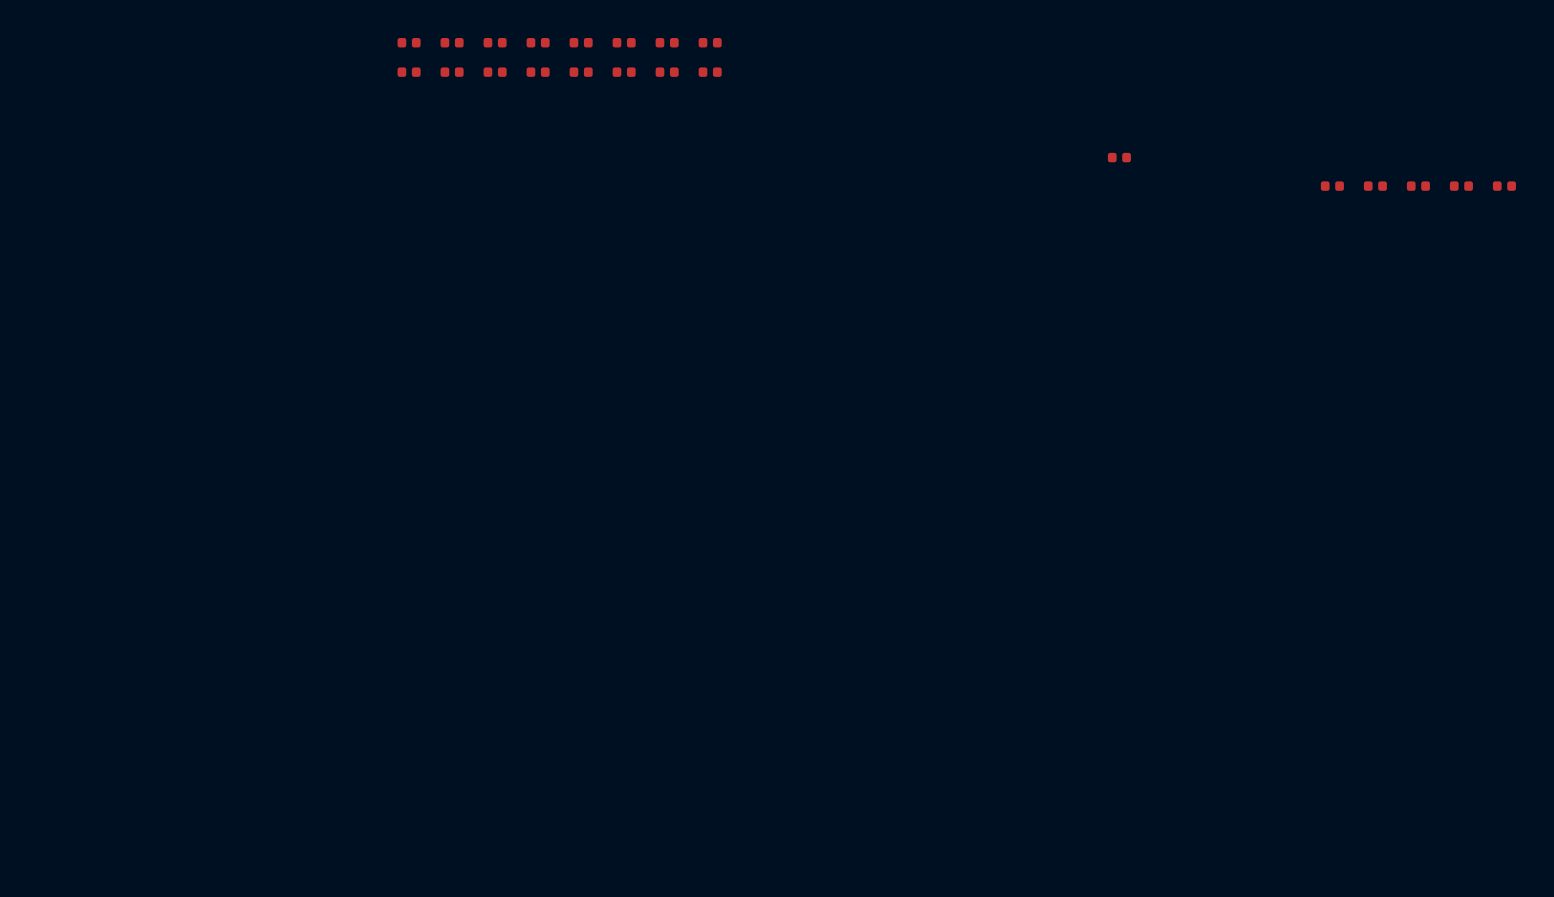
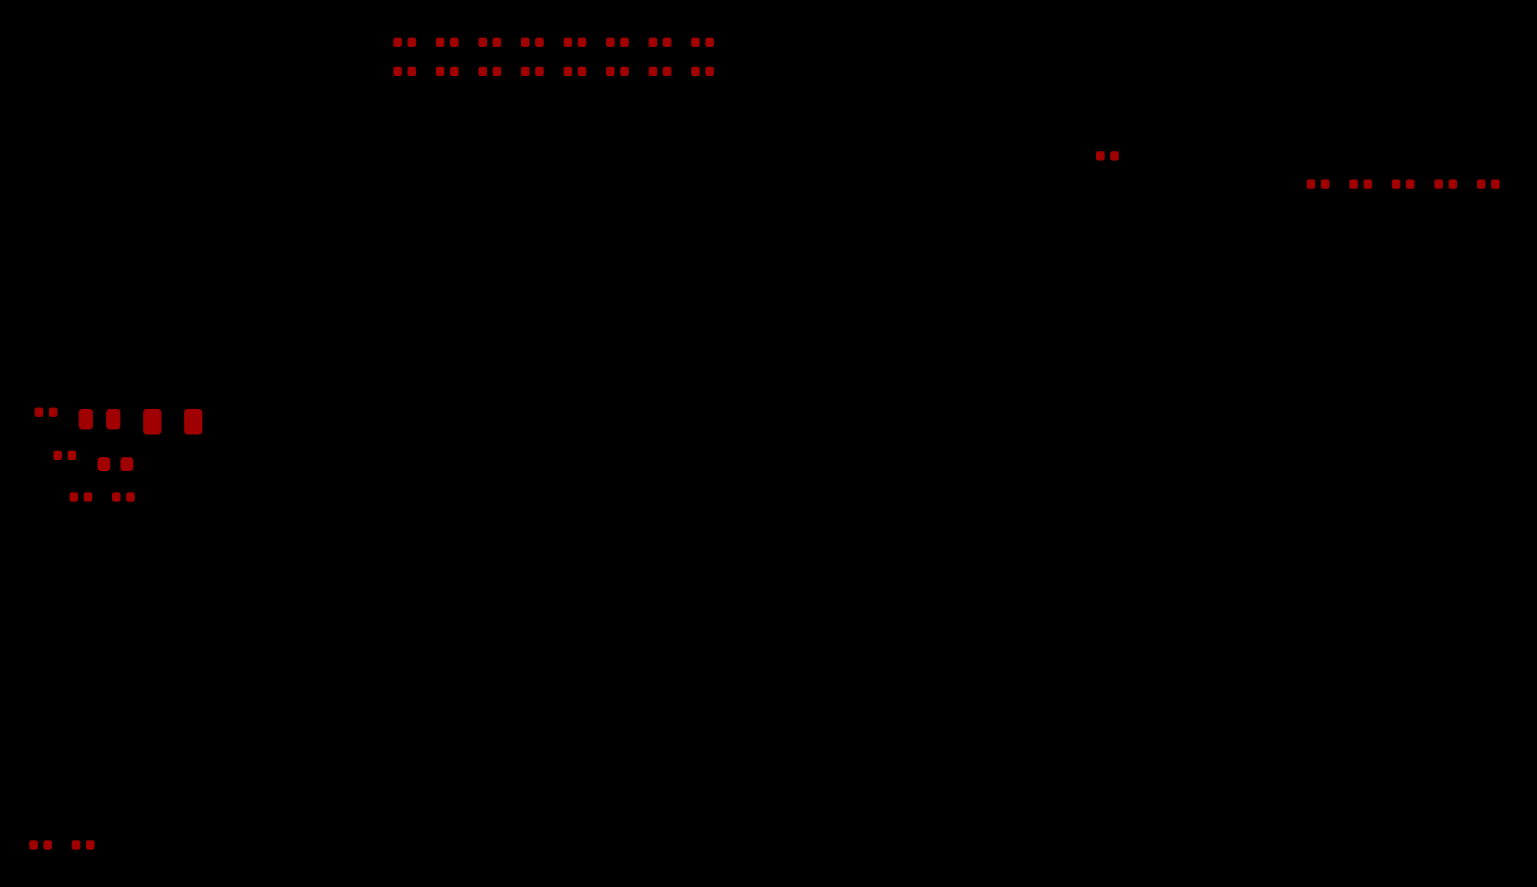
part: none -> (46, 412)
part: none -> (99, 419)
part: none -> (172, 421)
part: none -> (64, 455)
part: none -> (115, 464)
part: none -> (80, 496)
part: none -> (123, 496)
part: none -> (40, 844)
part: none -> (83, 844)

